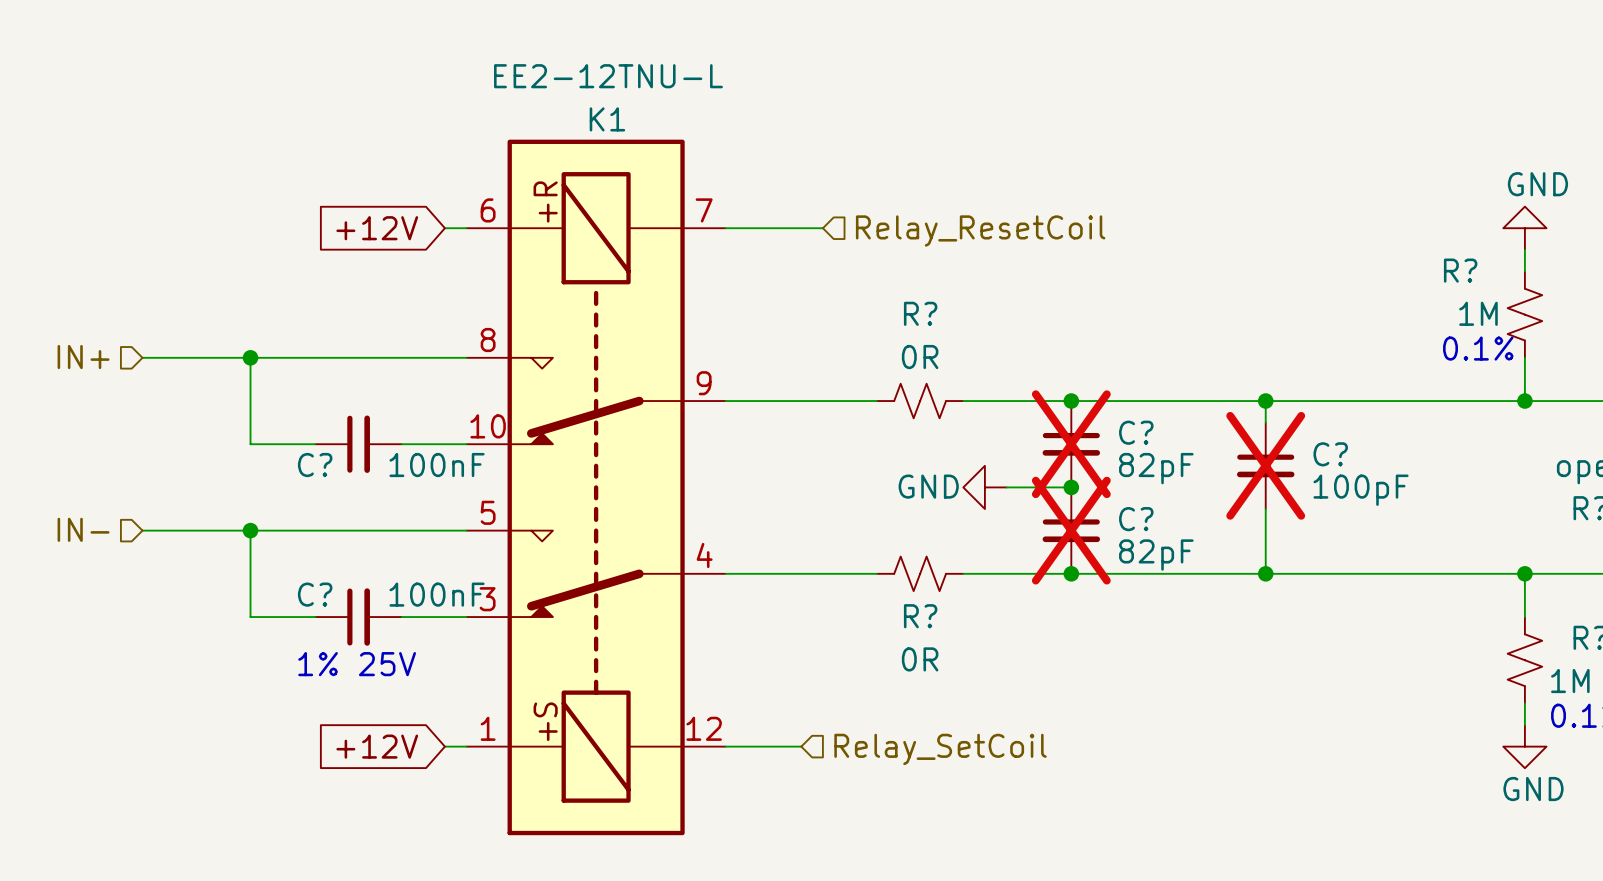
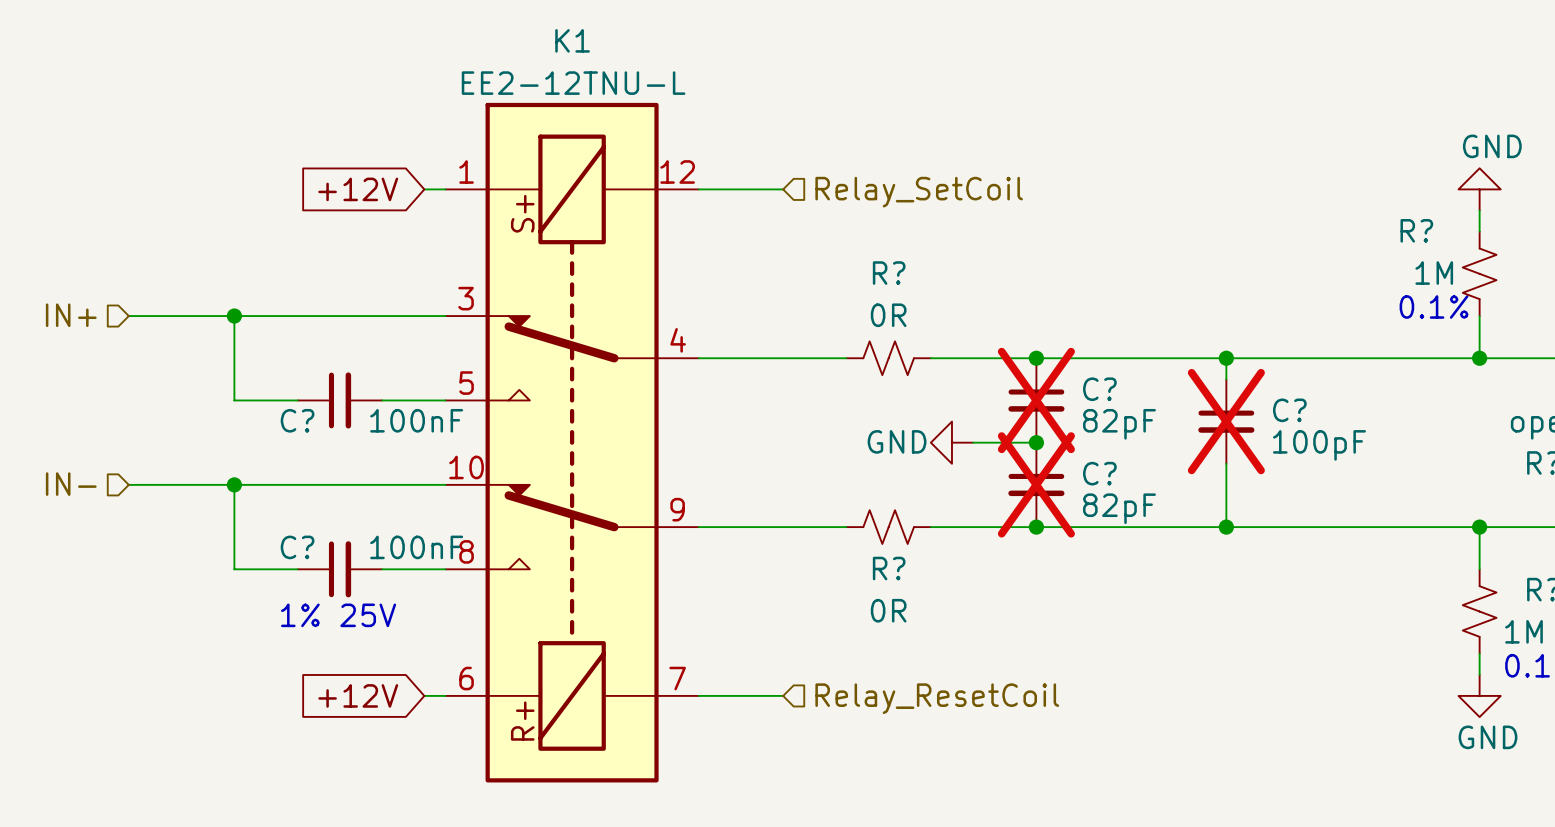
K1 value position: EE2-12TNU-L (608, 76) -> EE2-12TNU-L (573, 83)
K1 name position: K1 (607, 119) -> K1 (572, 40)
wire: (812, 228) (822, 228) -> none
hierarchical label: Relay_ResetCoil (980, 231) -> Relay_SetCoil (919, 192)
K1 flip: as is (596, 487) -> up-down (572, 442)
wire: none -> (772, 695) (783, 695)
hierarchical label: Relay_SetCoil (940, 749) -> Relay_ResetCoil (937, 698)

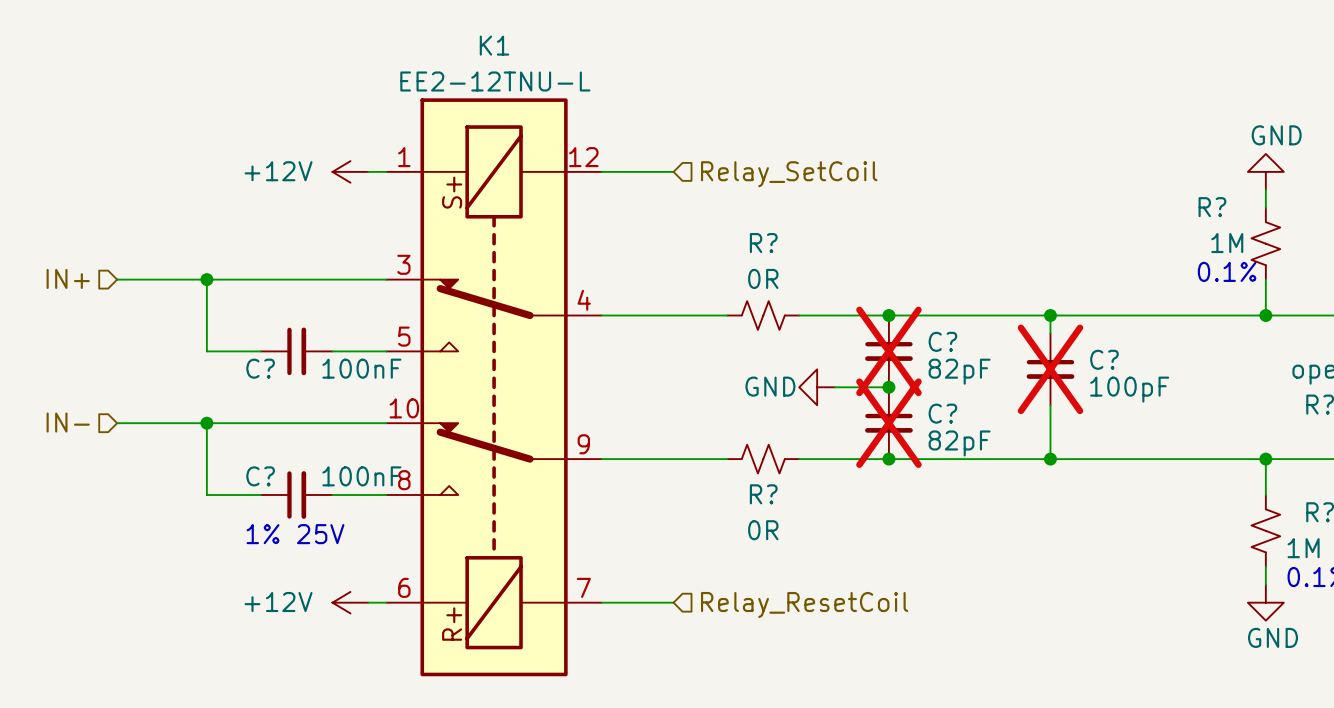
global label: +12V (358, 189) -> none
power symbol: none -> +12V (350, 171)
global label: +12V (358, 695) -> none
power symbol: none -> +12V (350, 602)

